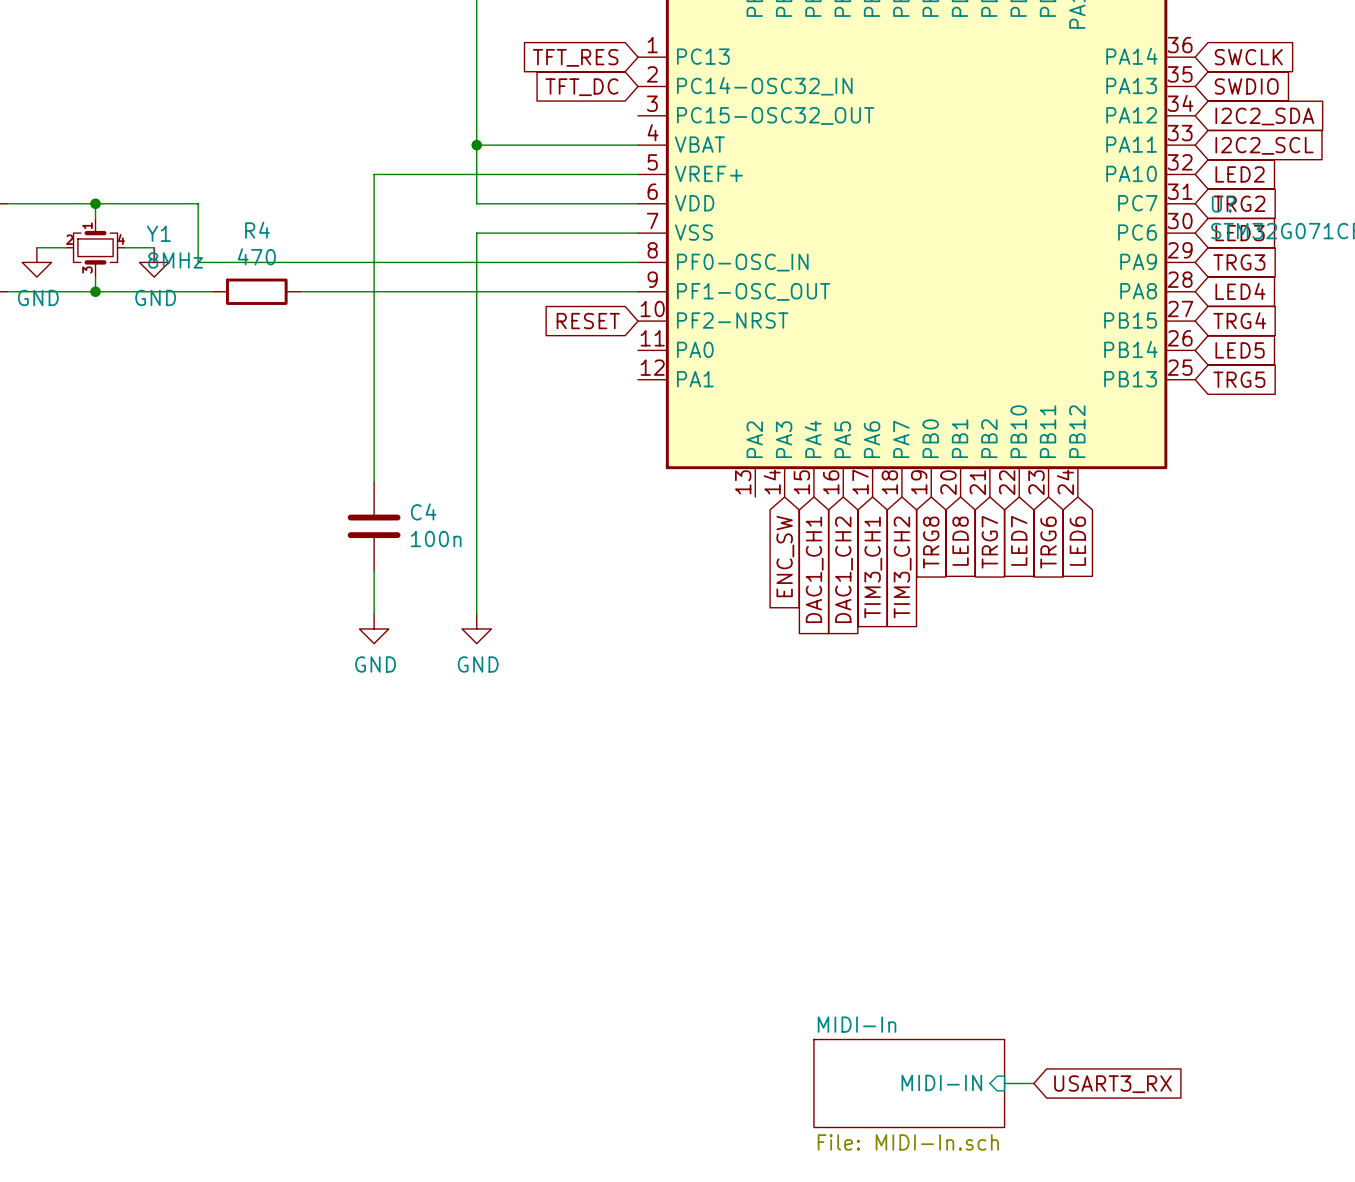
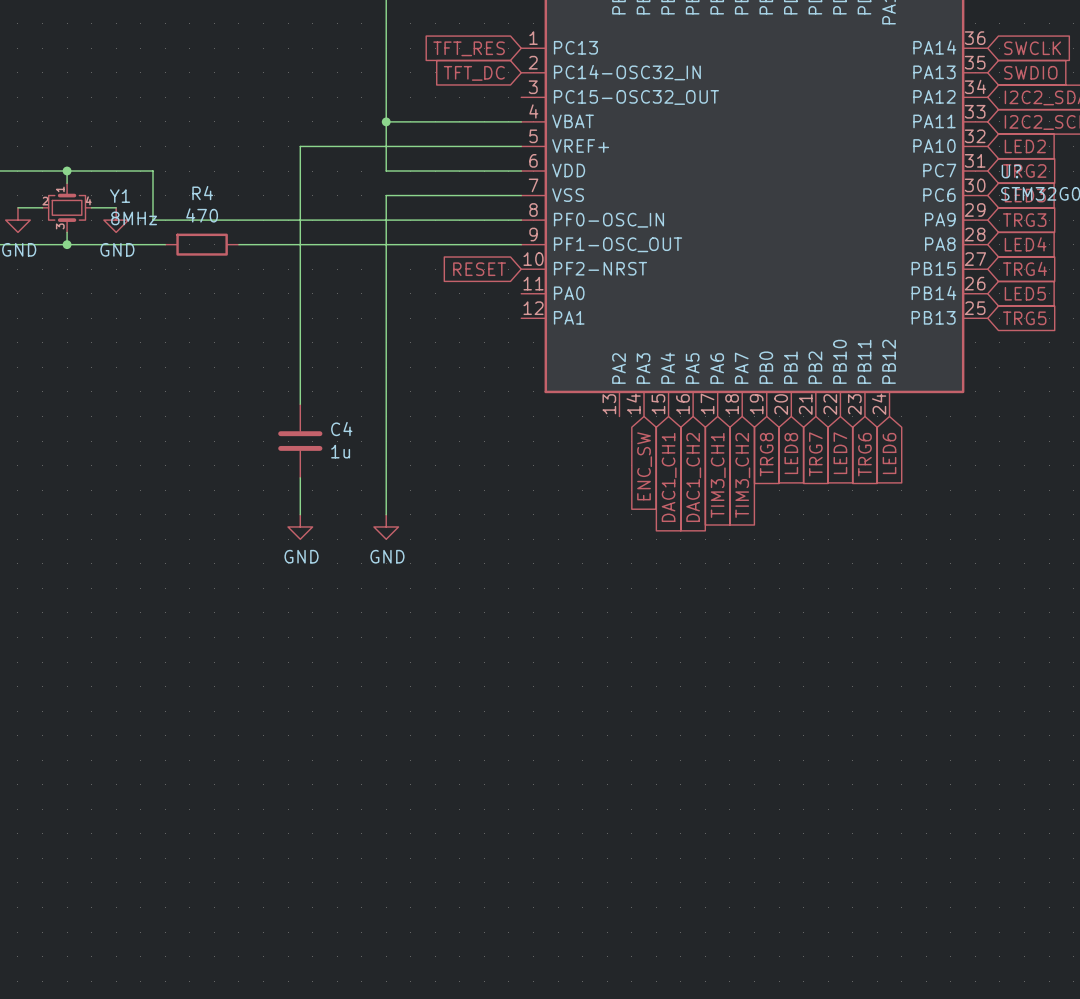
C4 value: 100n (436, 538) -> 1u (340, 451)
sheet pin: MIDI-IN (941, 1082) -> none
sheet MIDI-In: File: MIDI-In.sch (909, 1083) -> none
wire: (1004, 1083) (1033, 1083) -> none
global label: USART3_RX (1112, 1084) -> none

